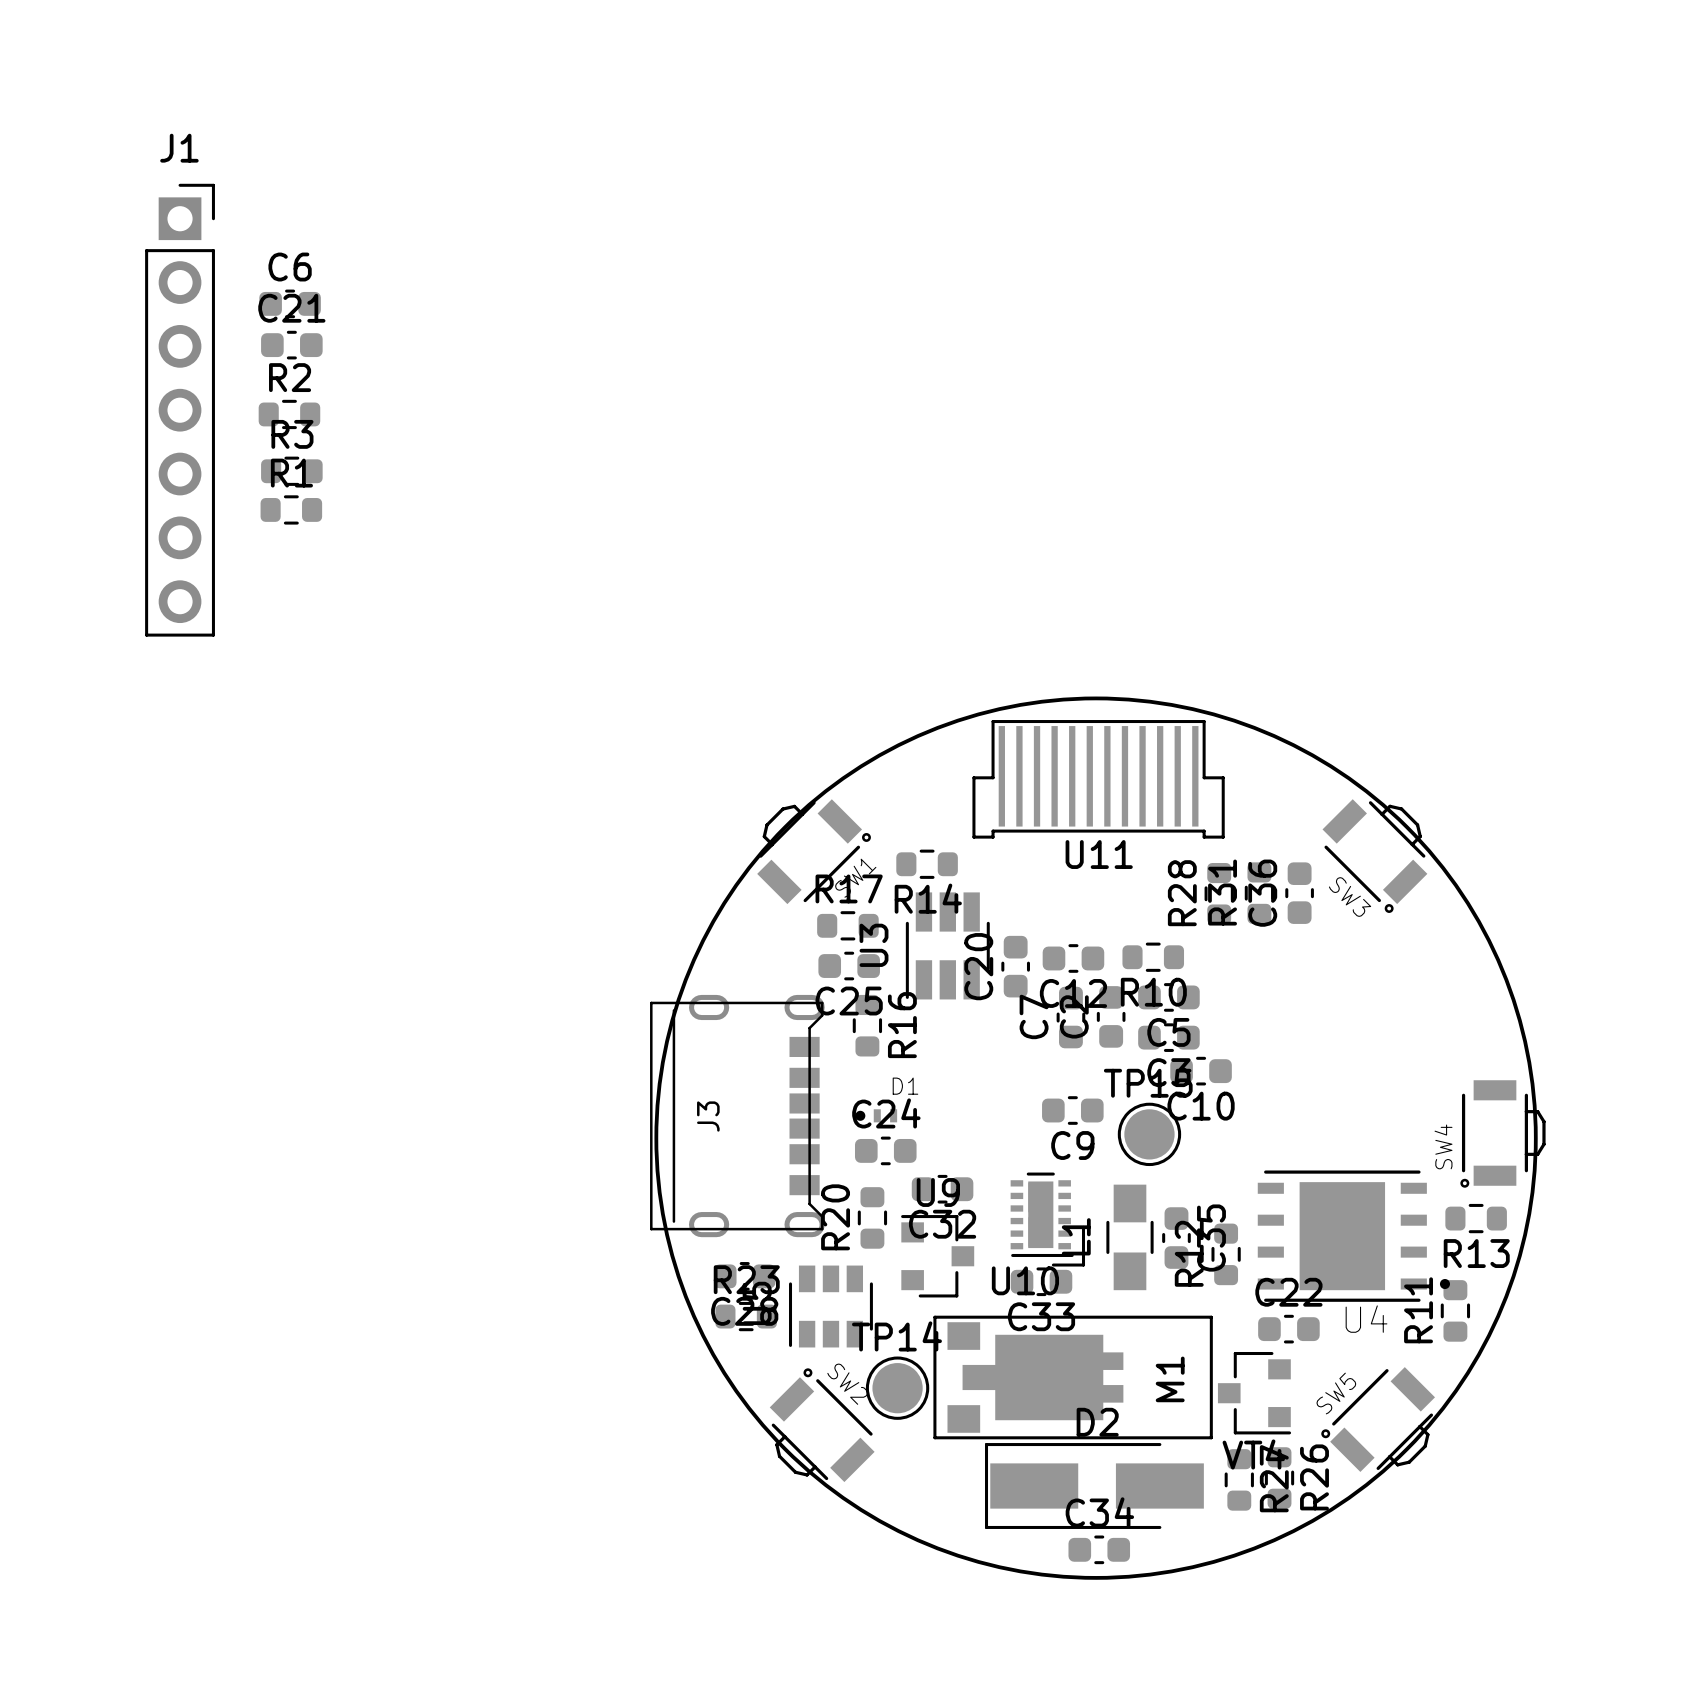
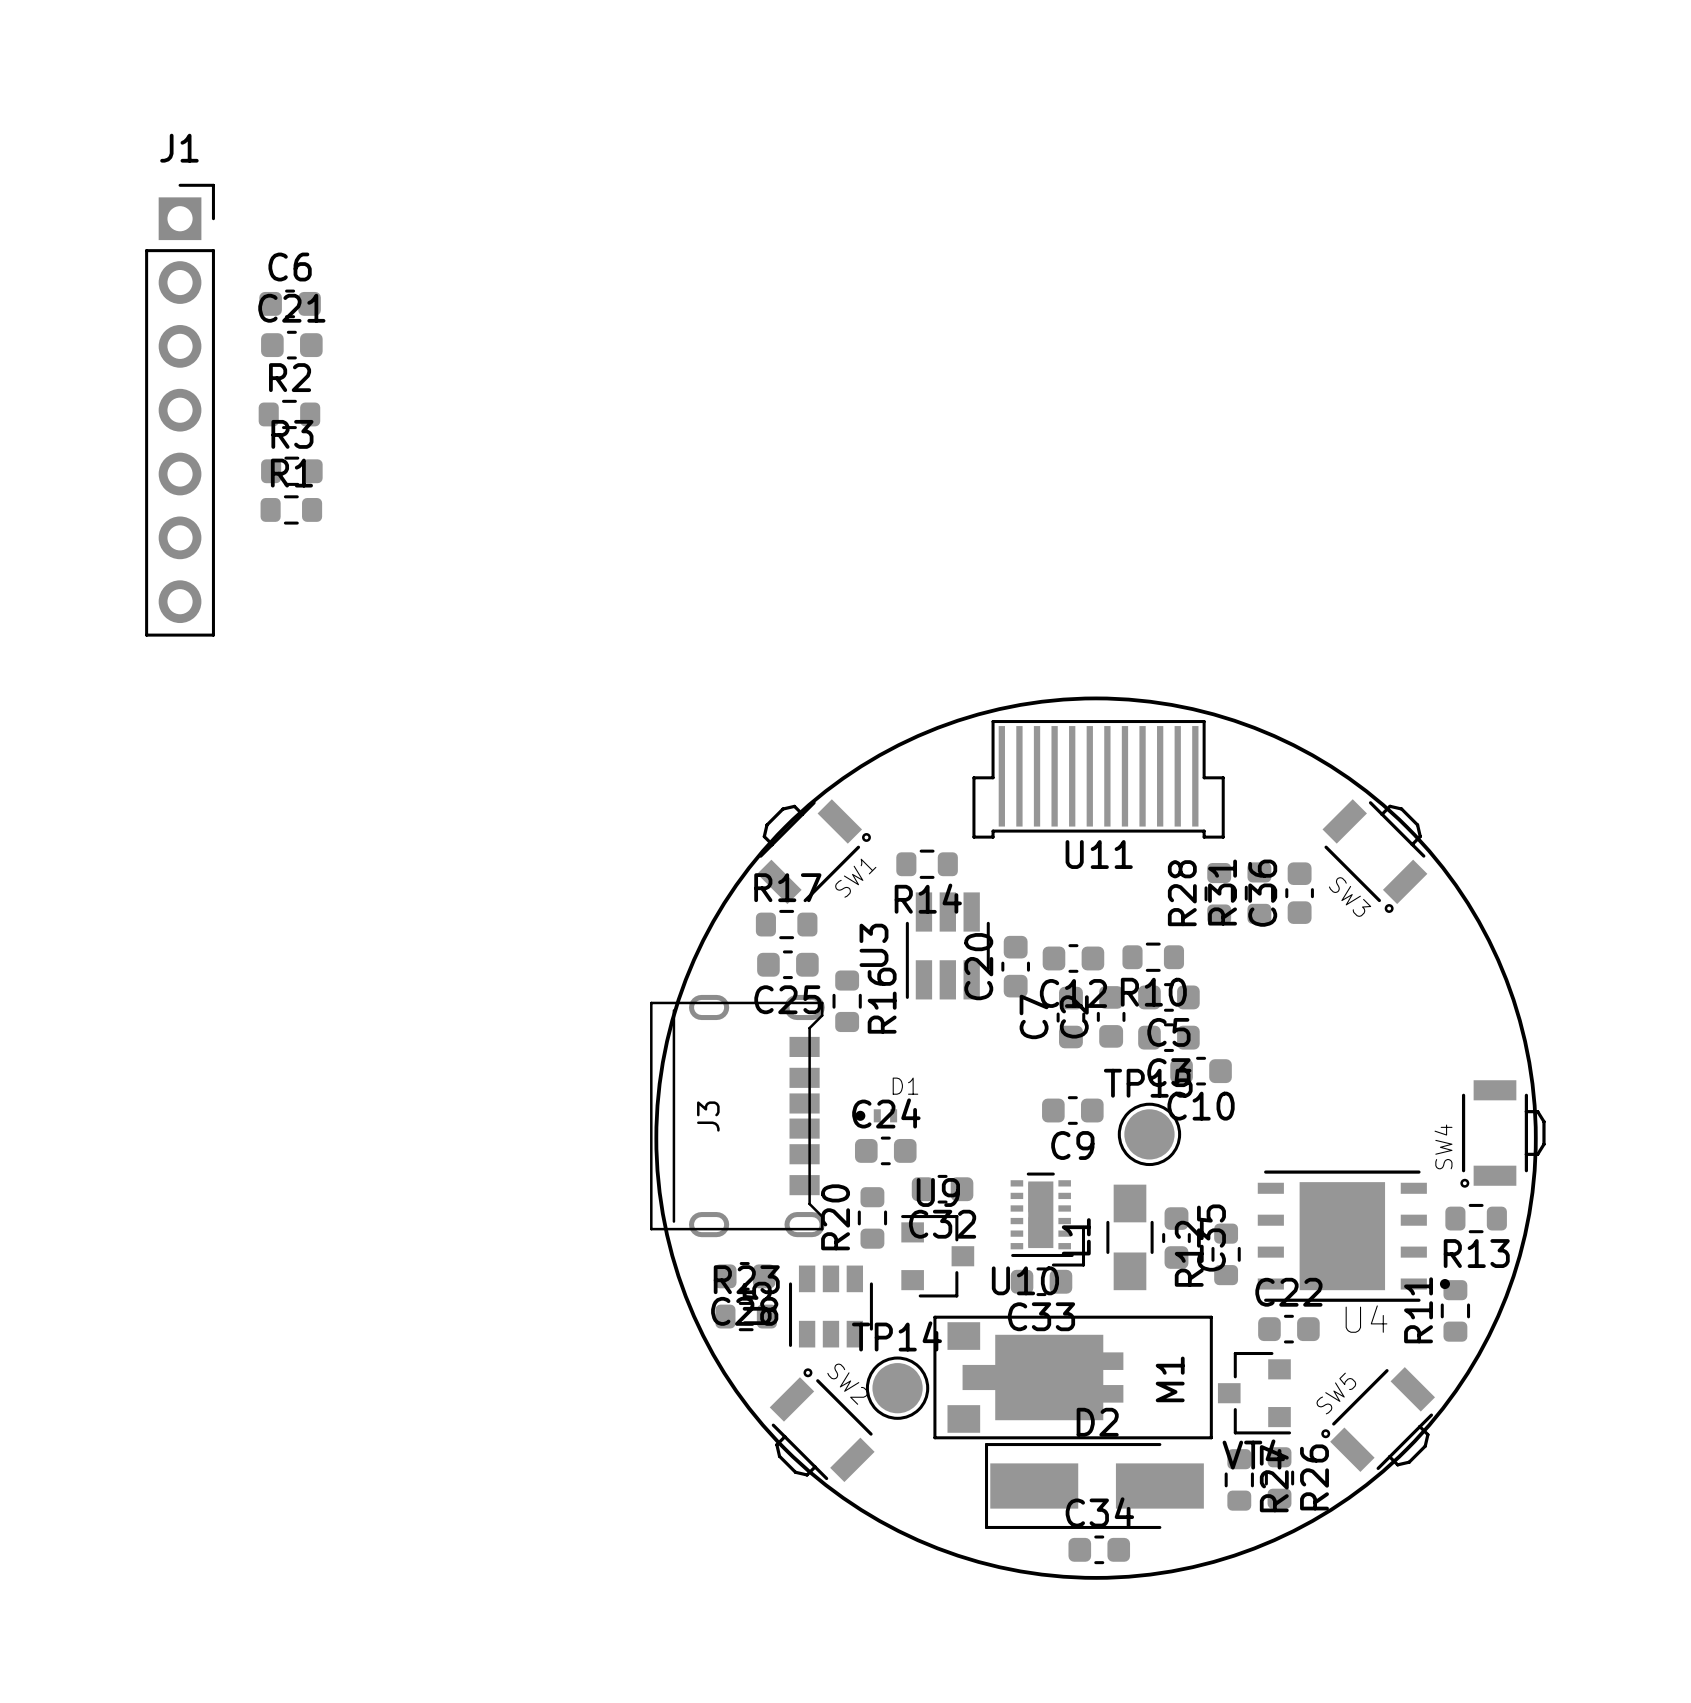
R17 position: (847, 925) -> (786, 924)
C25 position: (849, 966) -> (787, 964)
R16 position: (867, 1025) -> (847, 1001)

